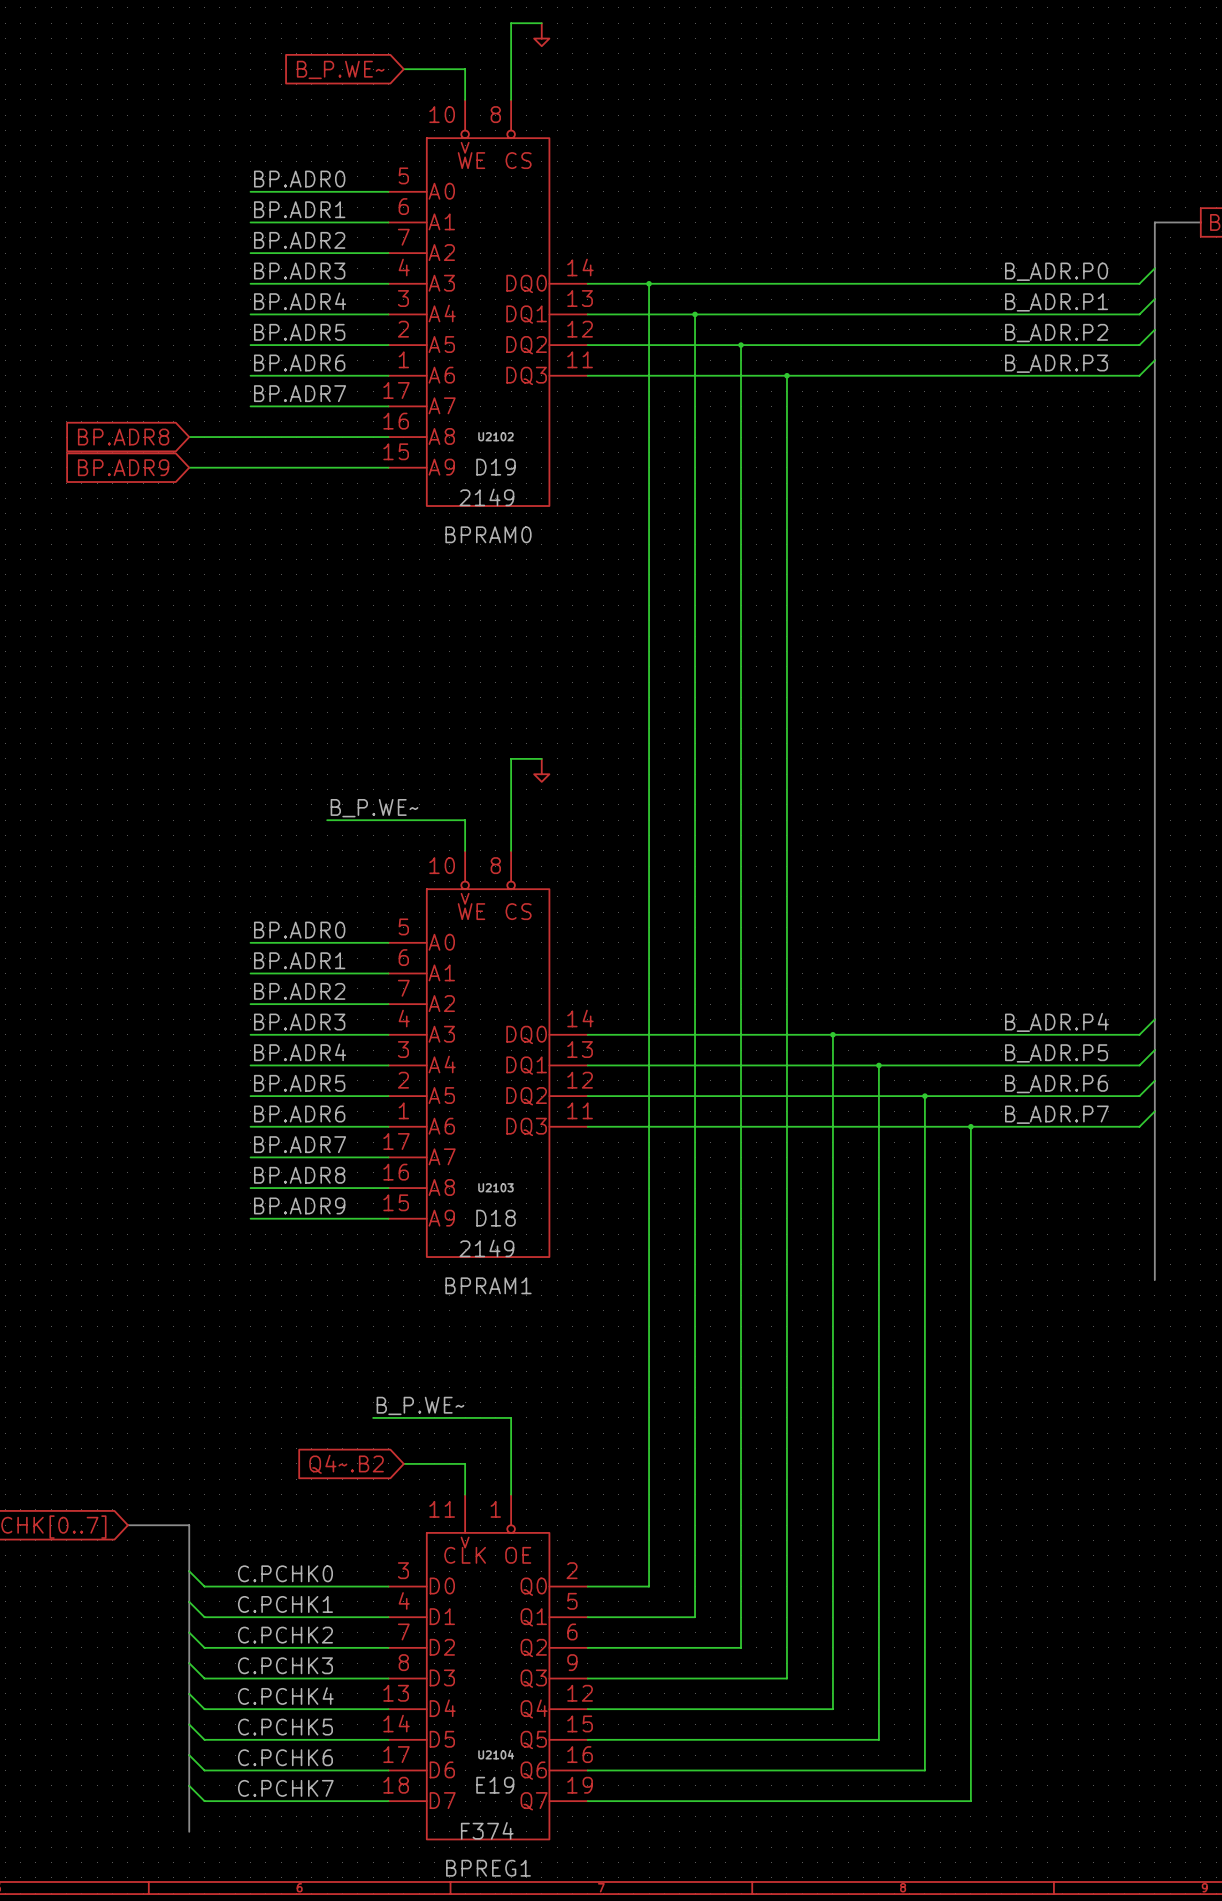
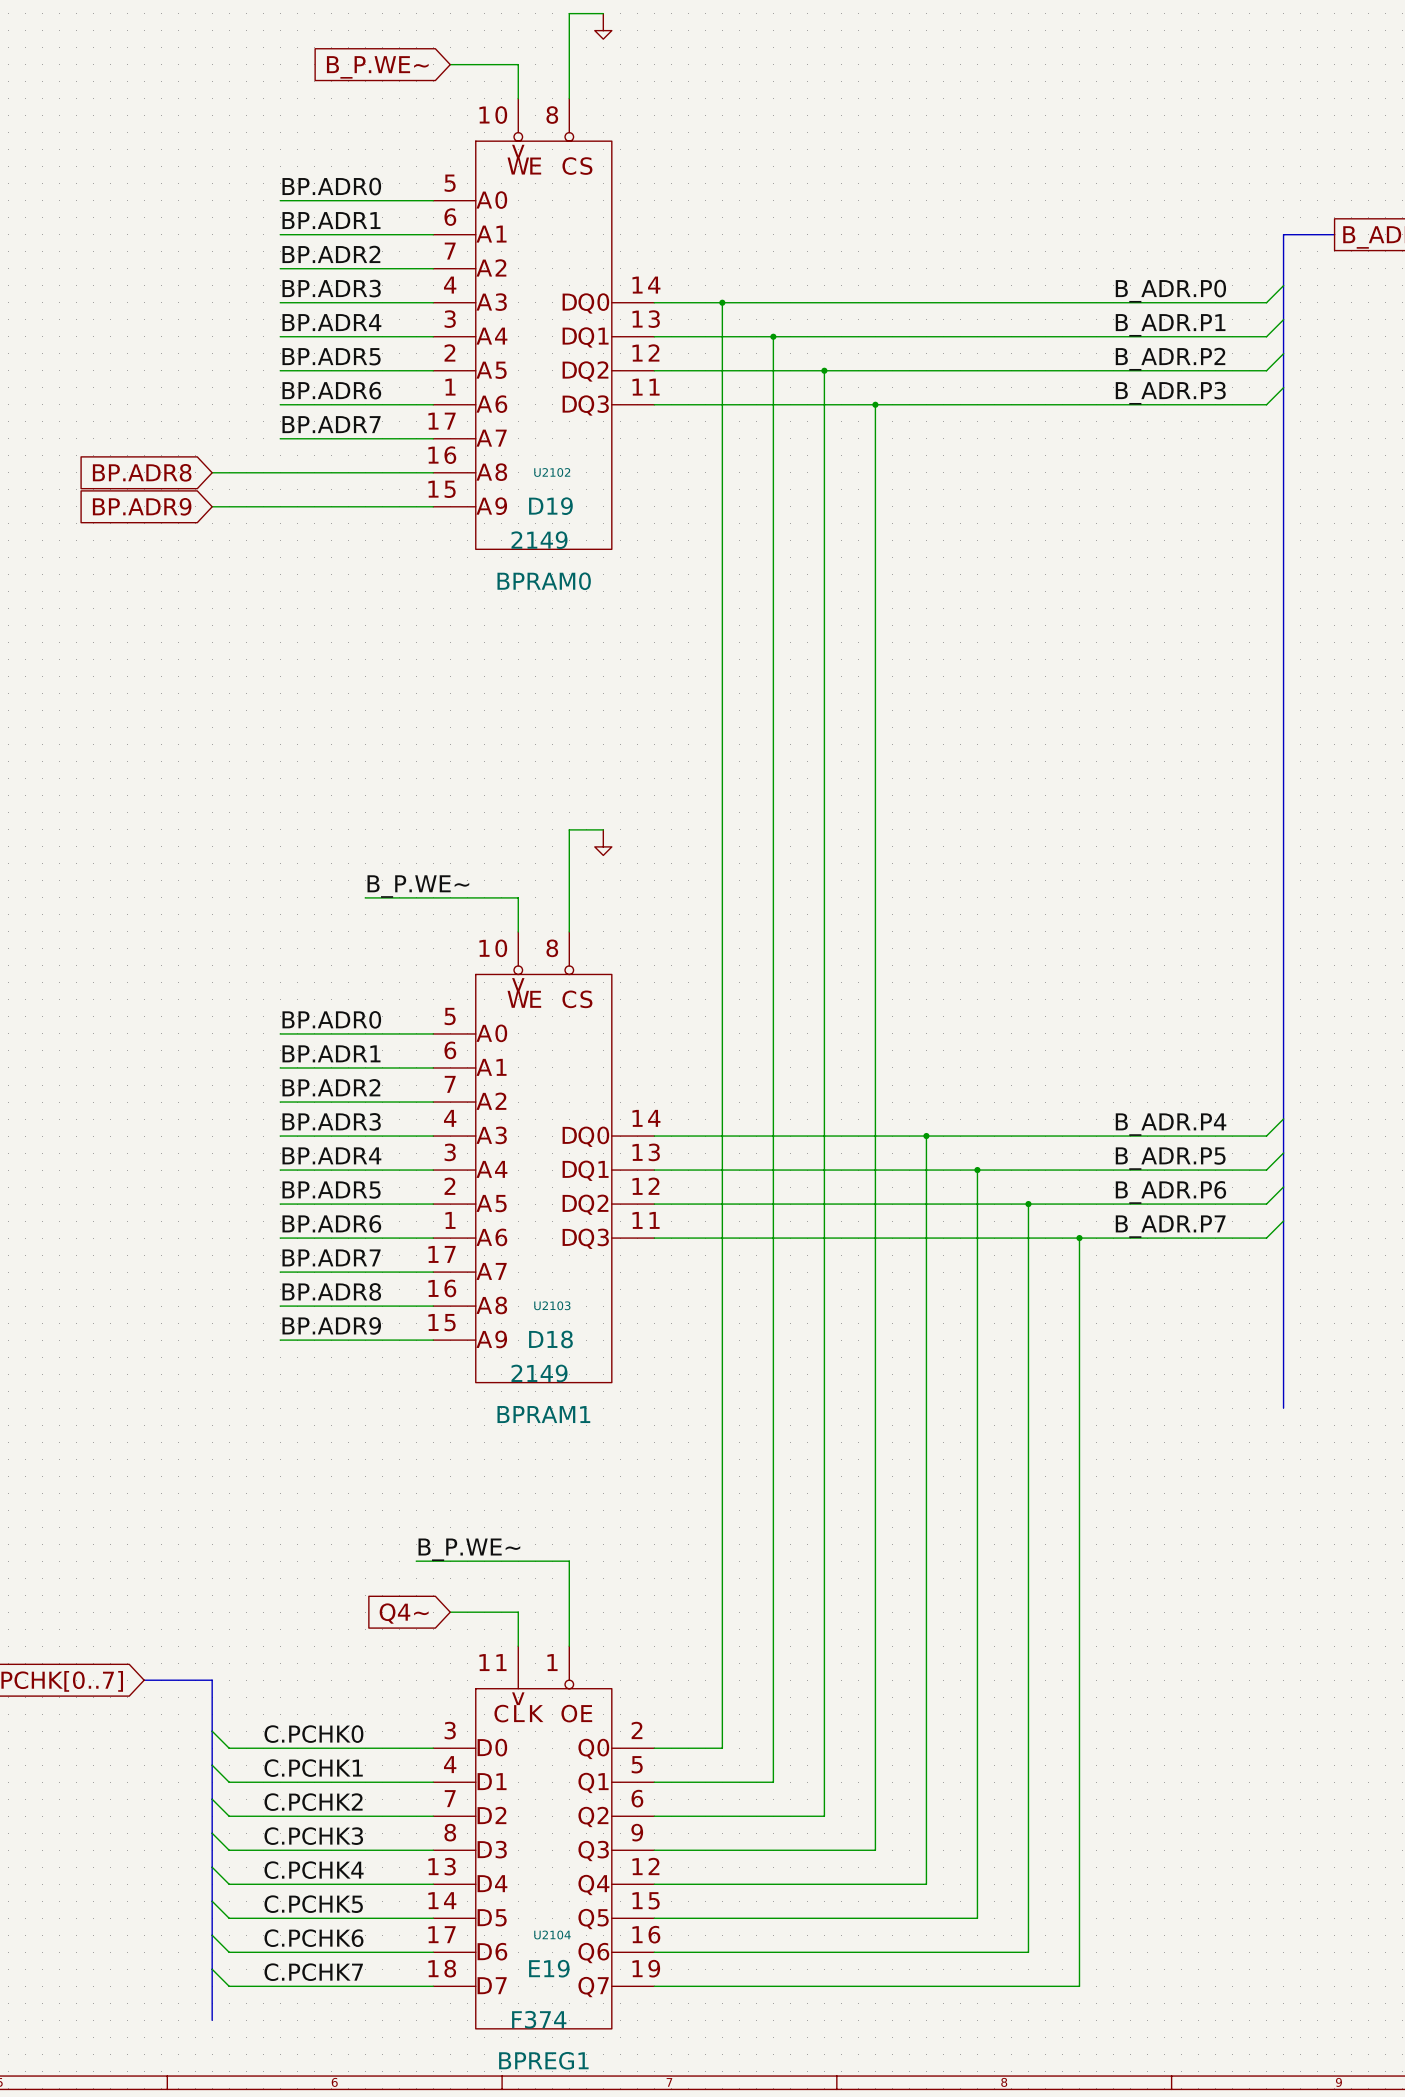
global label: Q4~.B2 (346, 1464) -> Q4~ (404, 1613)

